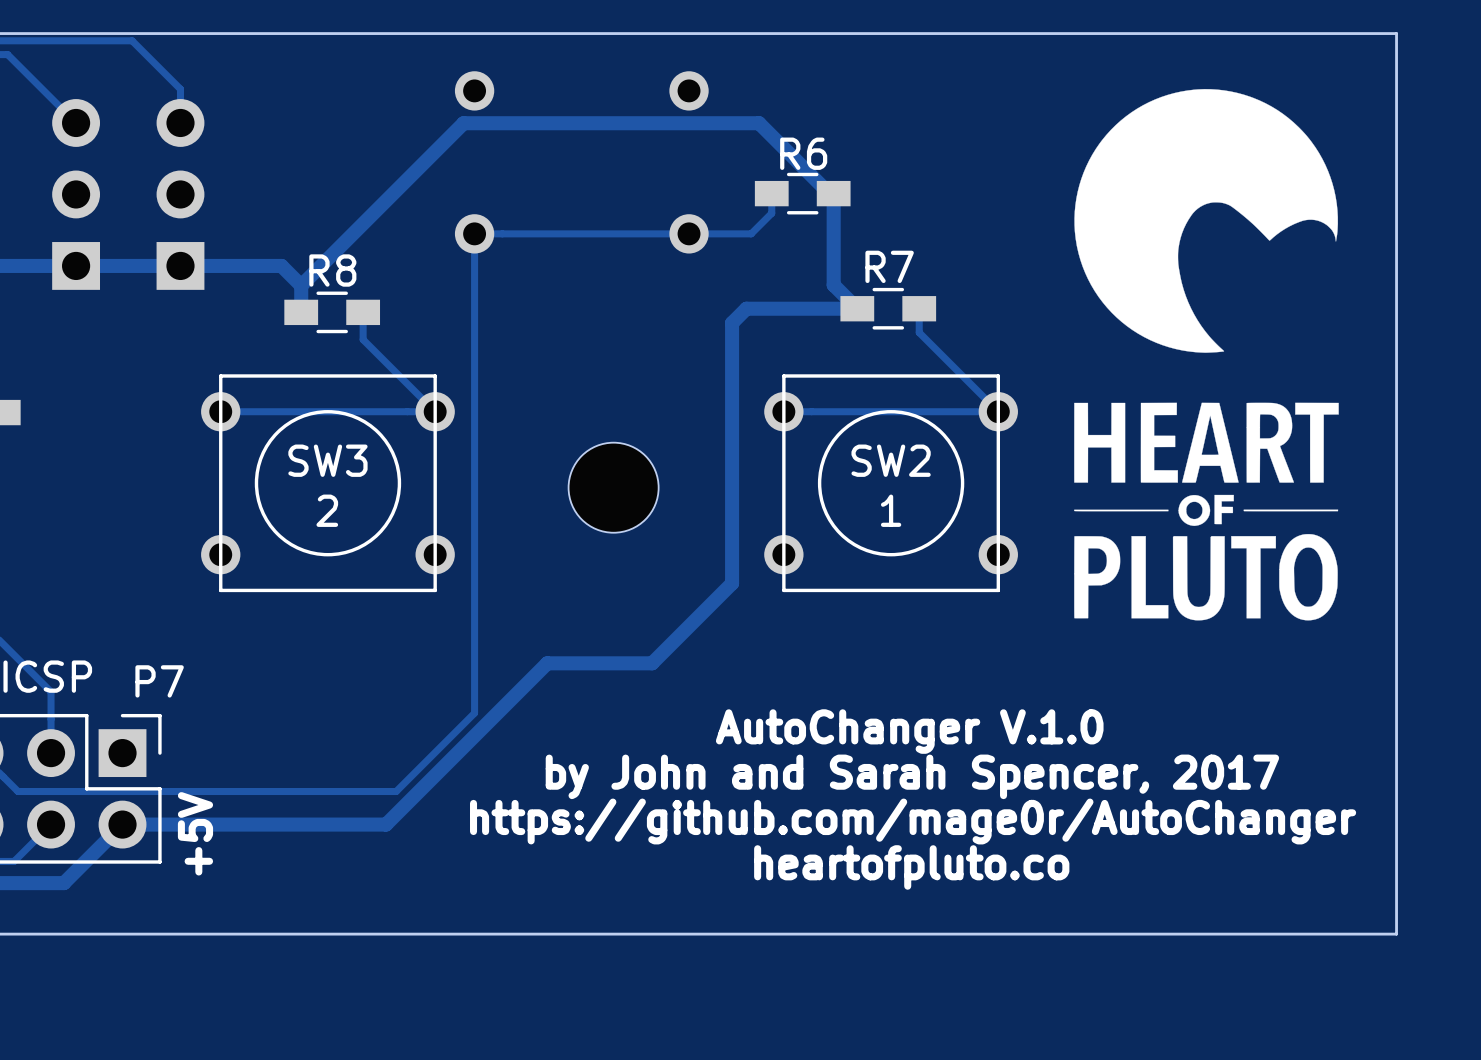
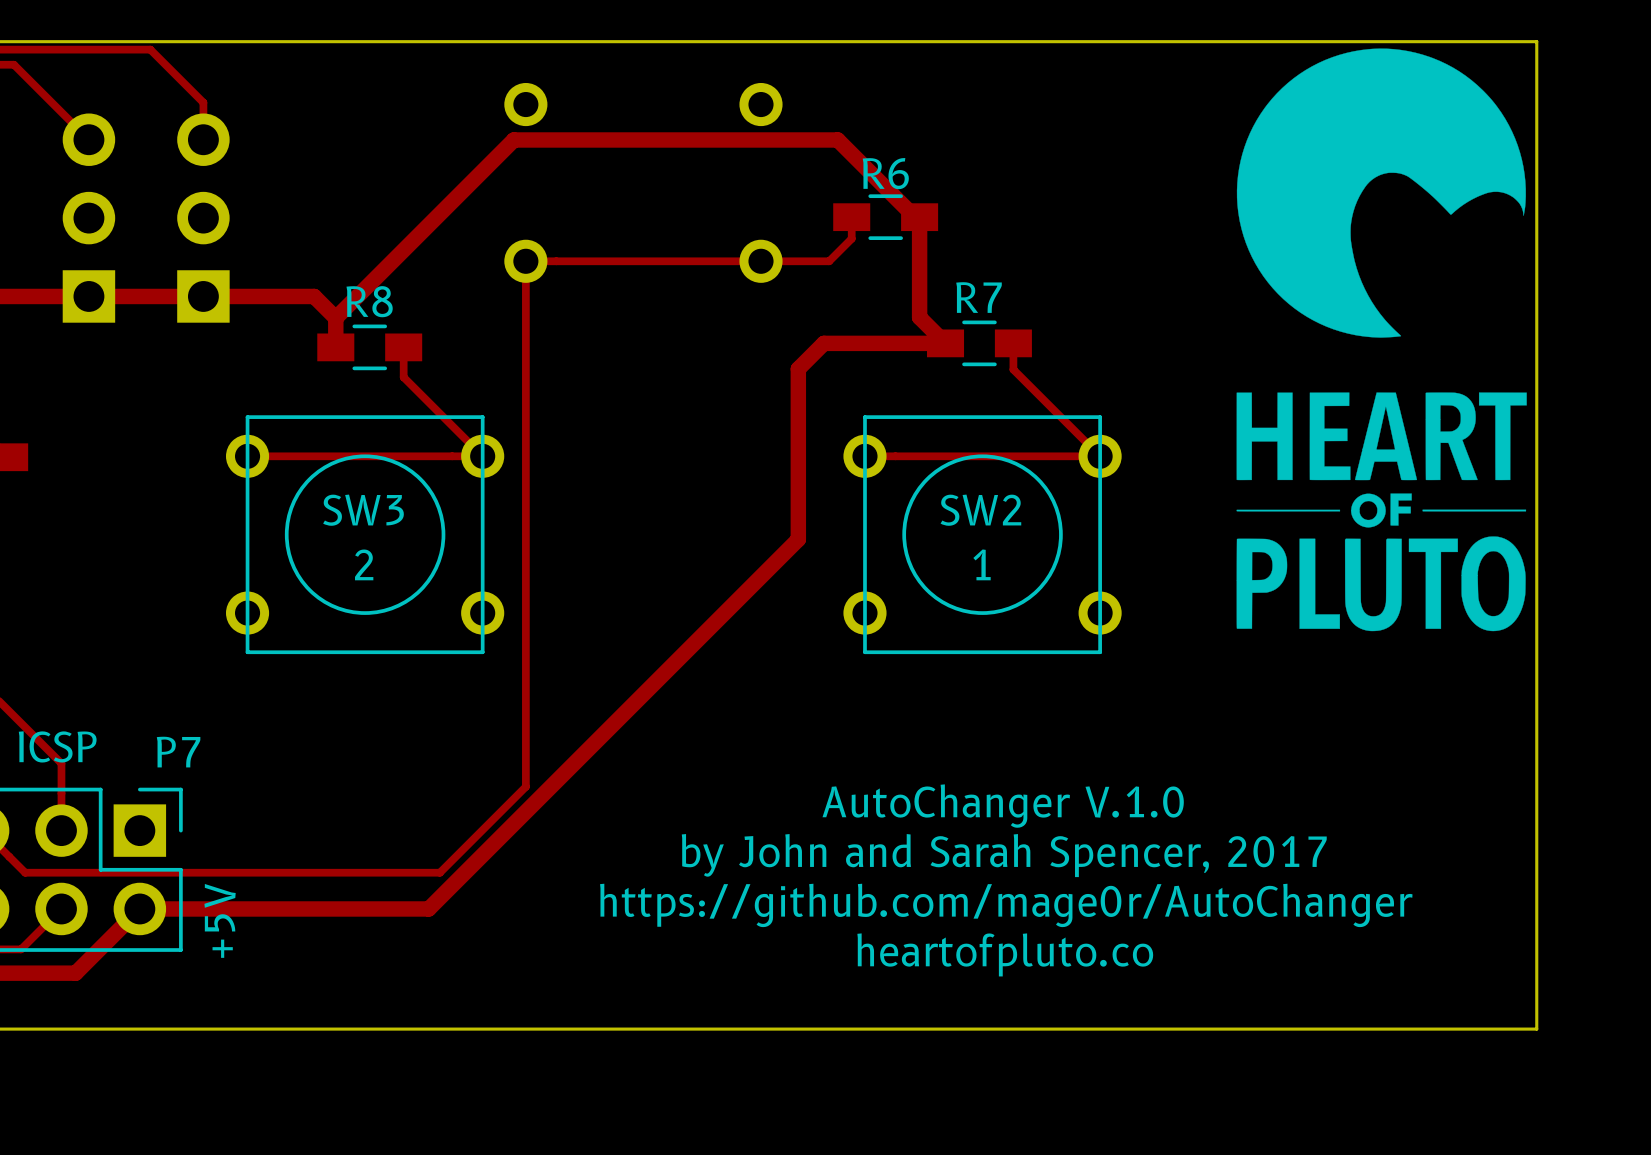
track: (732, 323) (732, 583) (652, 663) (547, 663) -> (808, 359) (798, 368) (798, 539) (605, 732)
drawing position: (1206, 354) -> (1381, 339)
part: (613, 487) -> none

